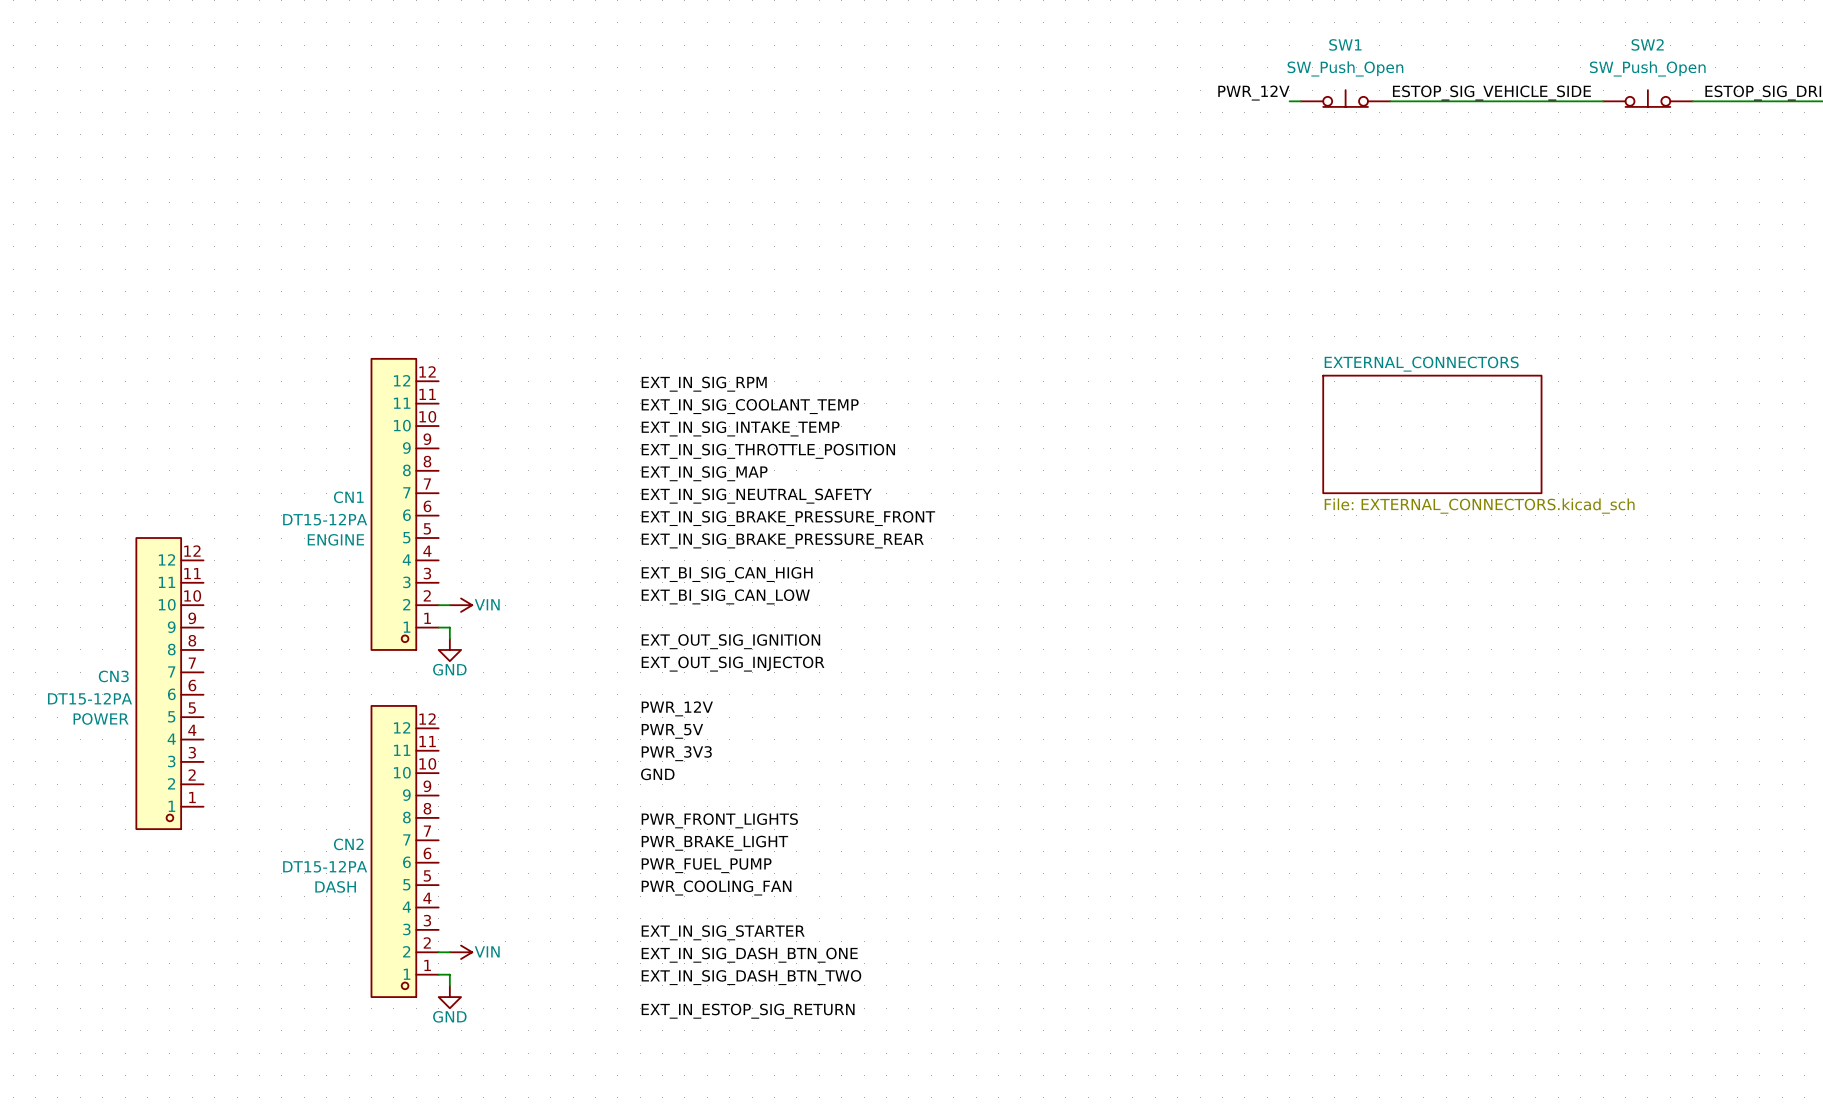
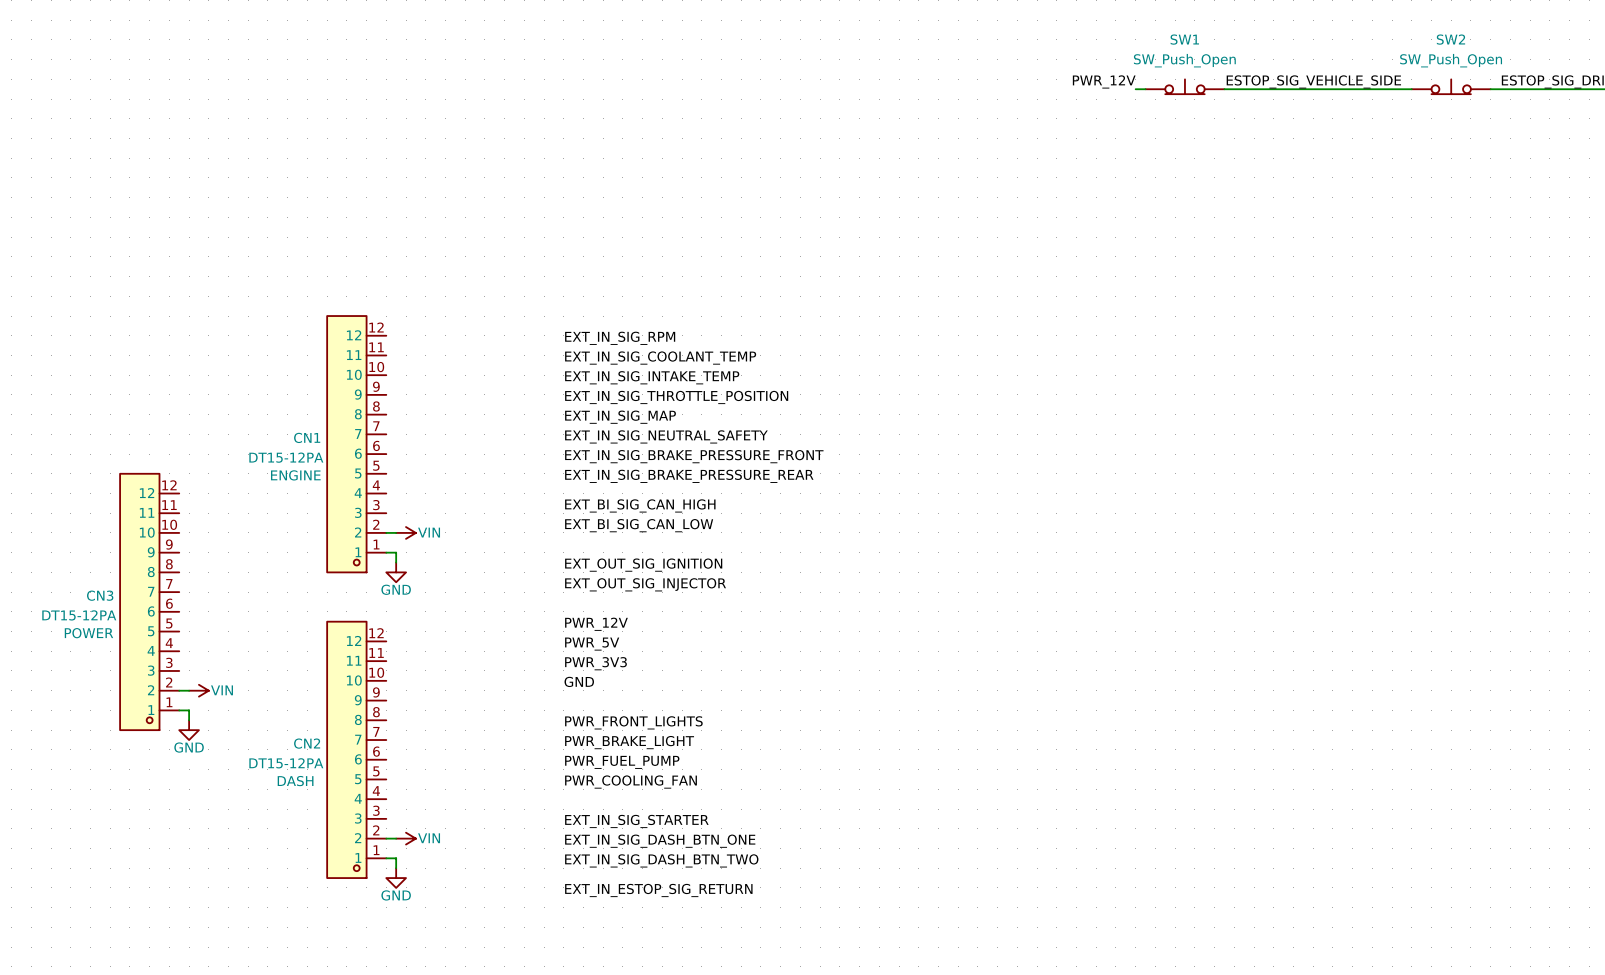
sheet EXTERNAL_CONNECTORS: File: EXTERNAL_CONNECTORS.kicad_sch (1432, 434) -> none
wire: none -> (179, 690) (189, 690)
power symbol: none -> VIN (198, 690)
wire: none -> (179, 710) (189, 710) (189, 720)
power symbol: none -> GND (189, 730)

